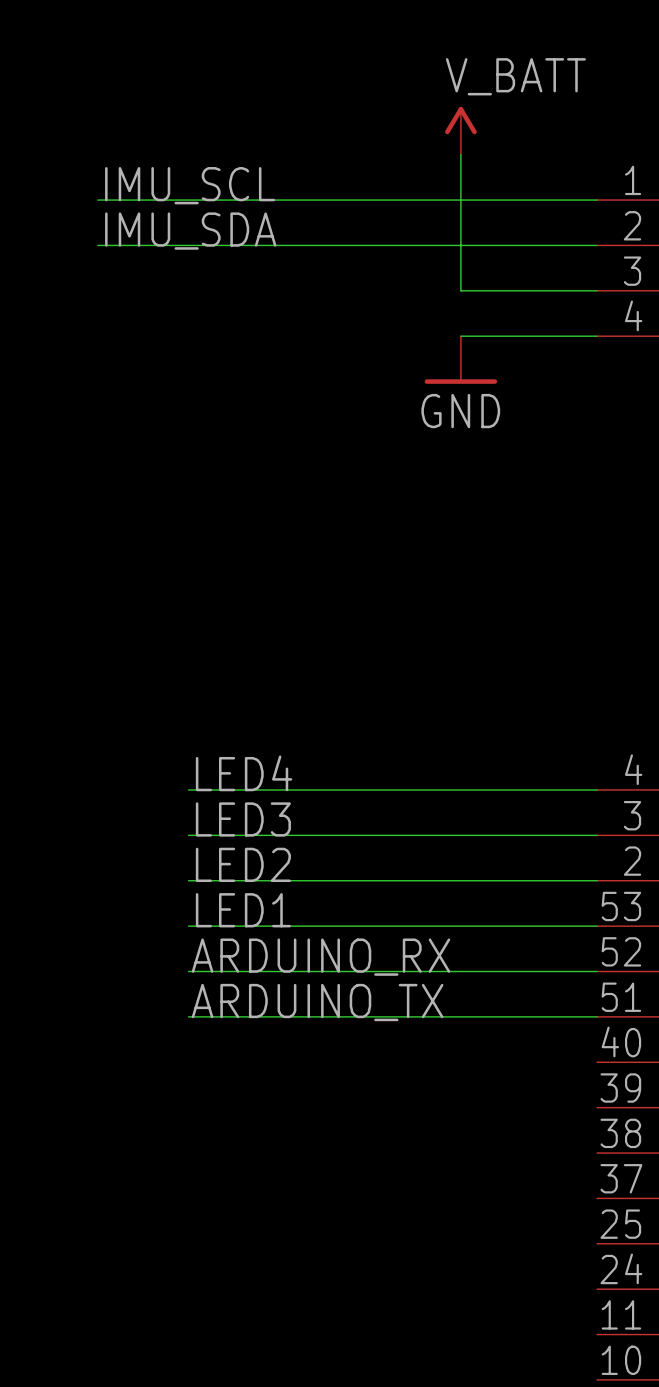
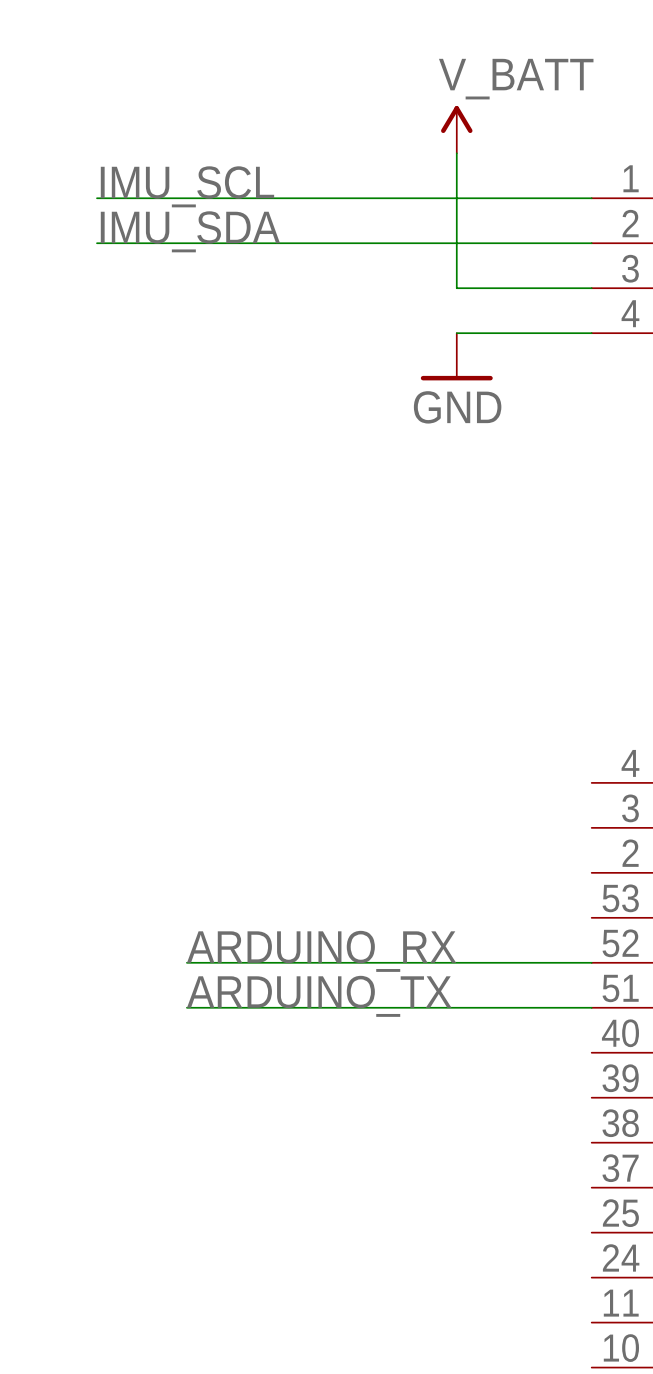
label: LED4 (244, 773) -> none
wire: (188, 789) (597, 789) -> none
label: LED3 (243, 819) -> none
wire: (188, 835) (597, 835) -> none
label: LED2 (243, 864) -> none
wire: (188, 880) (597, 880) -> none
label: LED1 (243, 910) -> none
wire: (188, 926) (597, 926) -> none

